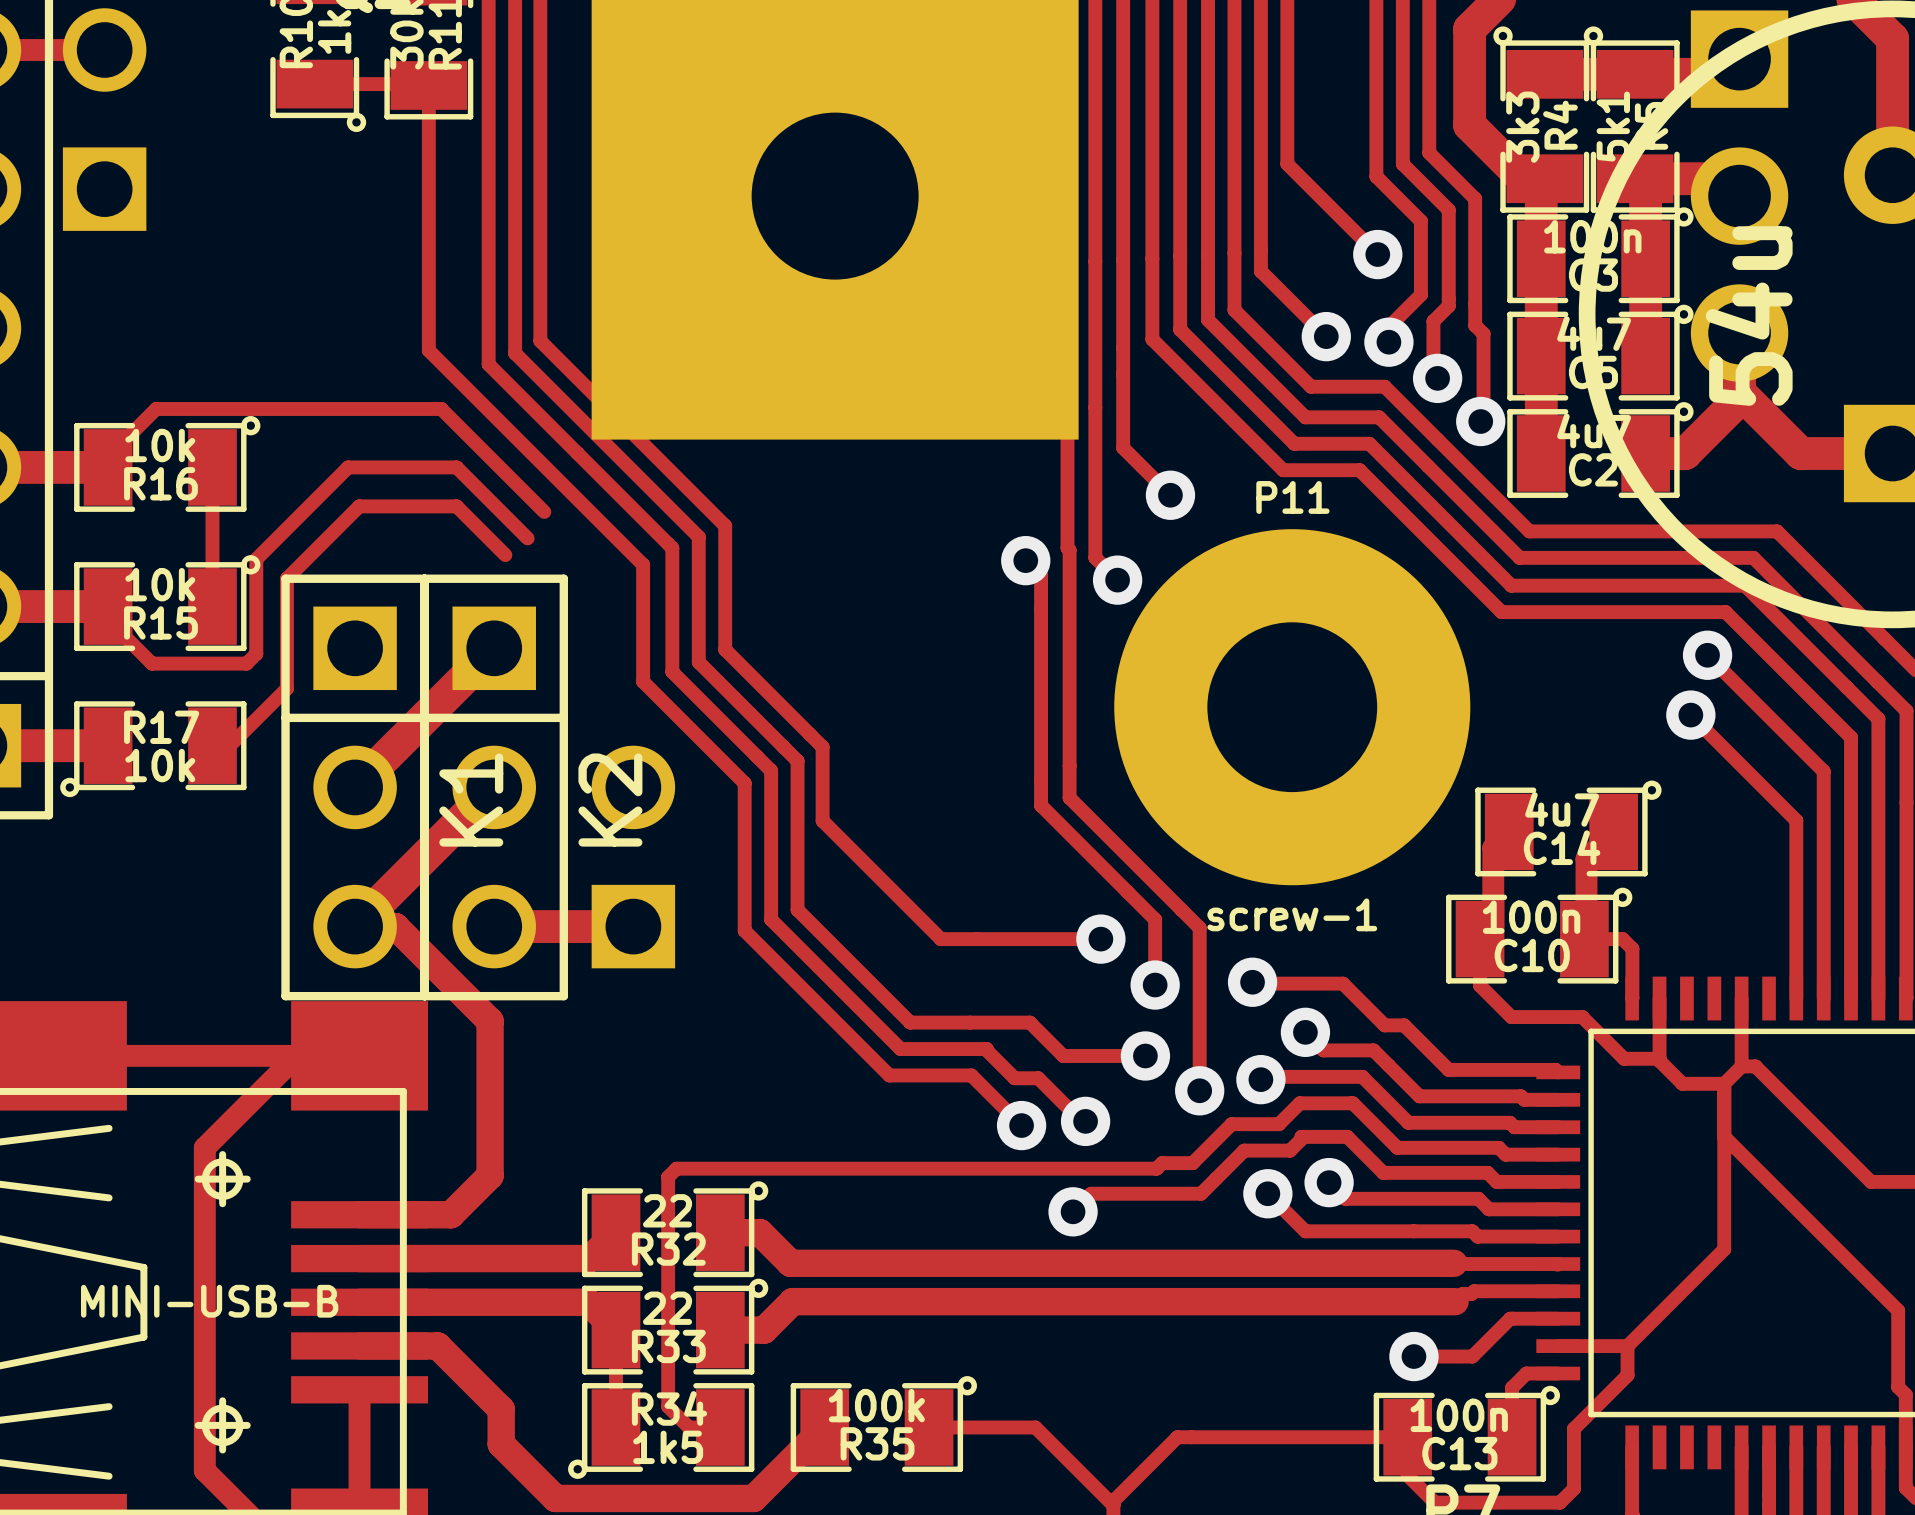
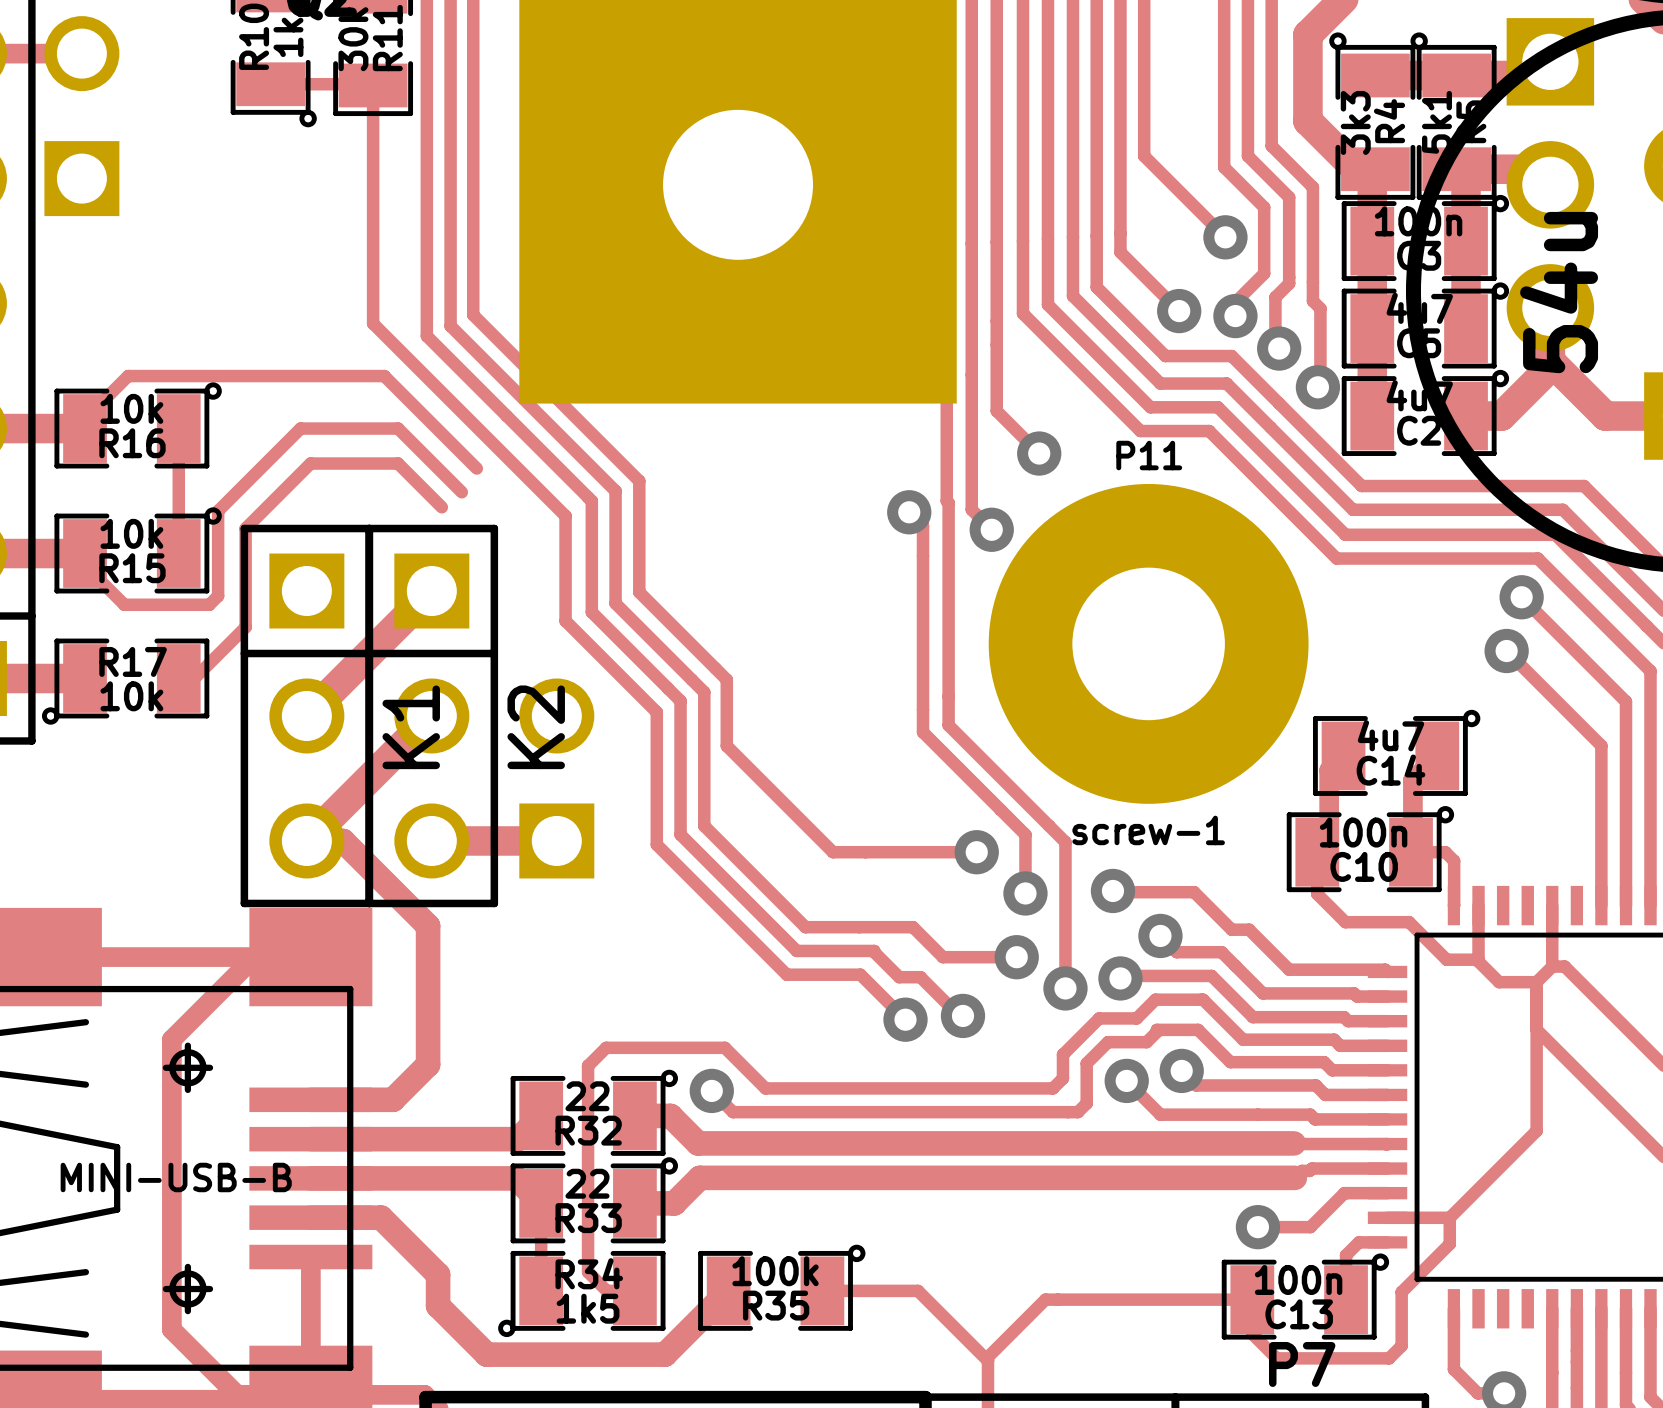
track: (1237, 1124) (1231, 1124) (1192, 1163) (1162, 1163) (1156, 1168) (676, 1168) -> (1099, 1018) (1062, 1054) (1062, 1078) (1052, 1088) (765, 1088) (724, 1047) (606, 1047) (595, 1058)
track: (1246, 1150) (1244, 1150) (1201, 1193) (1091, 1193) (1073, 1211) -> (1107, 1042) (1086, 1063) (1086, 1103) (1077, 1112) (733, 1112) (711, 1090)
via position: (1073, 1211) -> (711, 1090)

